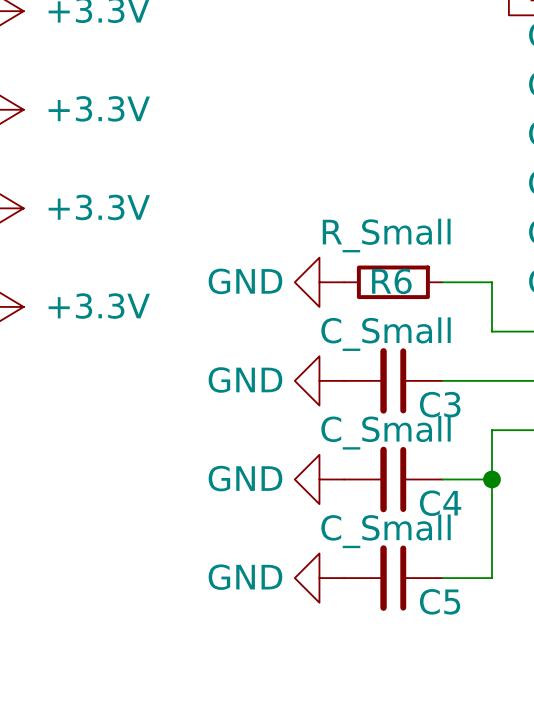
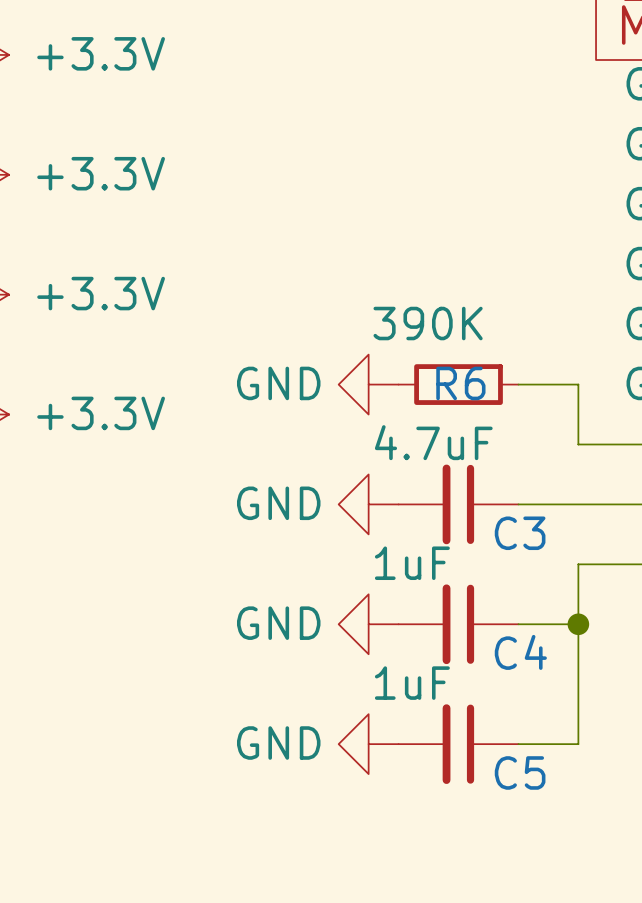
R6 value: R_Small (386, 235) -> 390K (428, 323)
C3 value: C_Small (386, 334) -> 4.7uF (433, 442)
C4 value: C_Small (386, 432) -> 1uF (412, 563)
C5 value: C_Small (386, 531) -> 1uF (412, 683)

